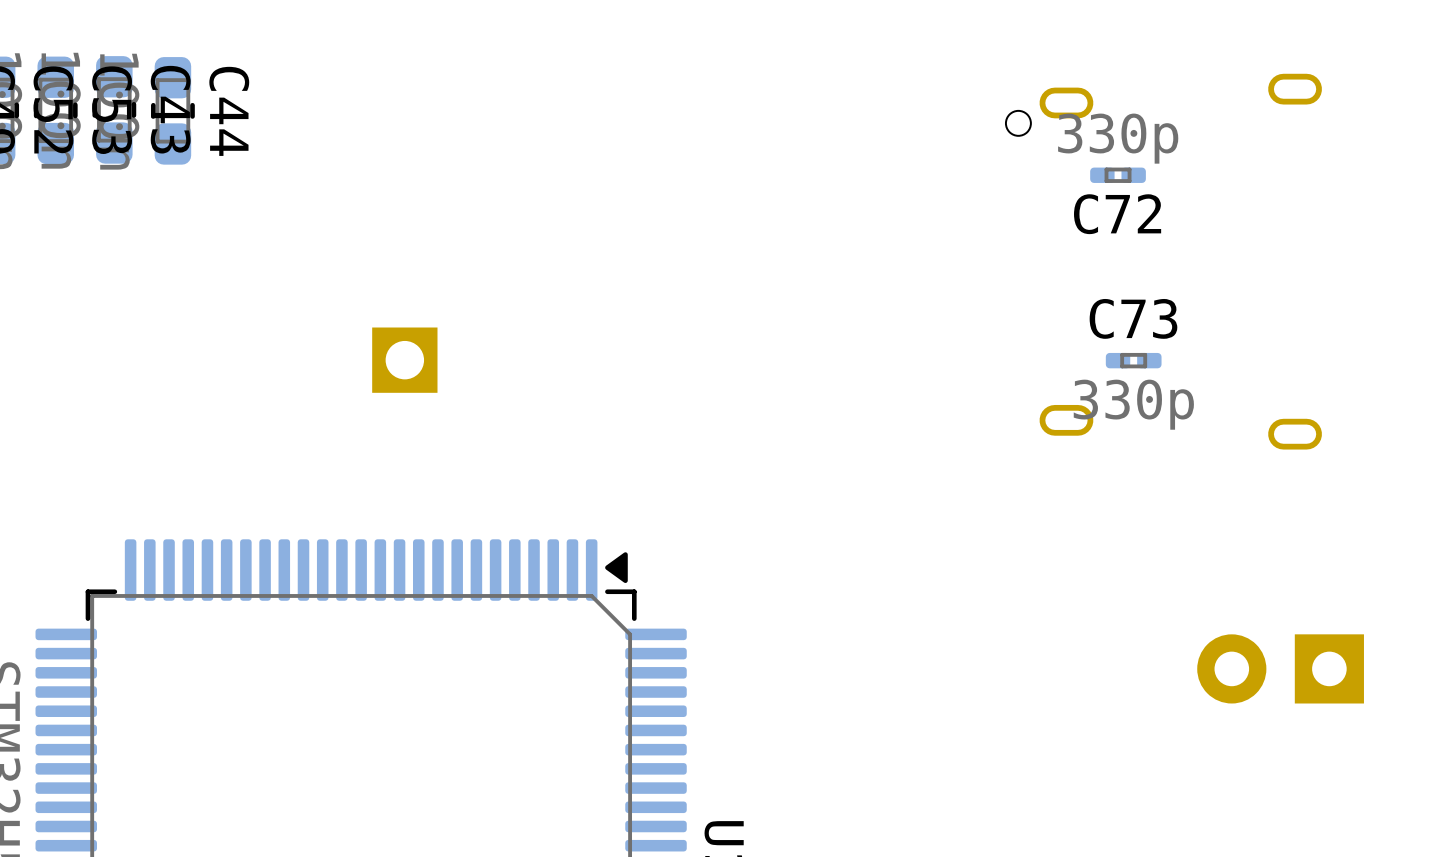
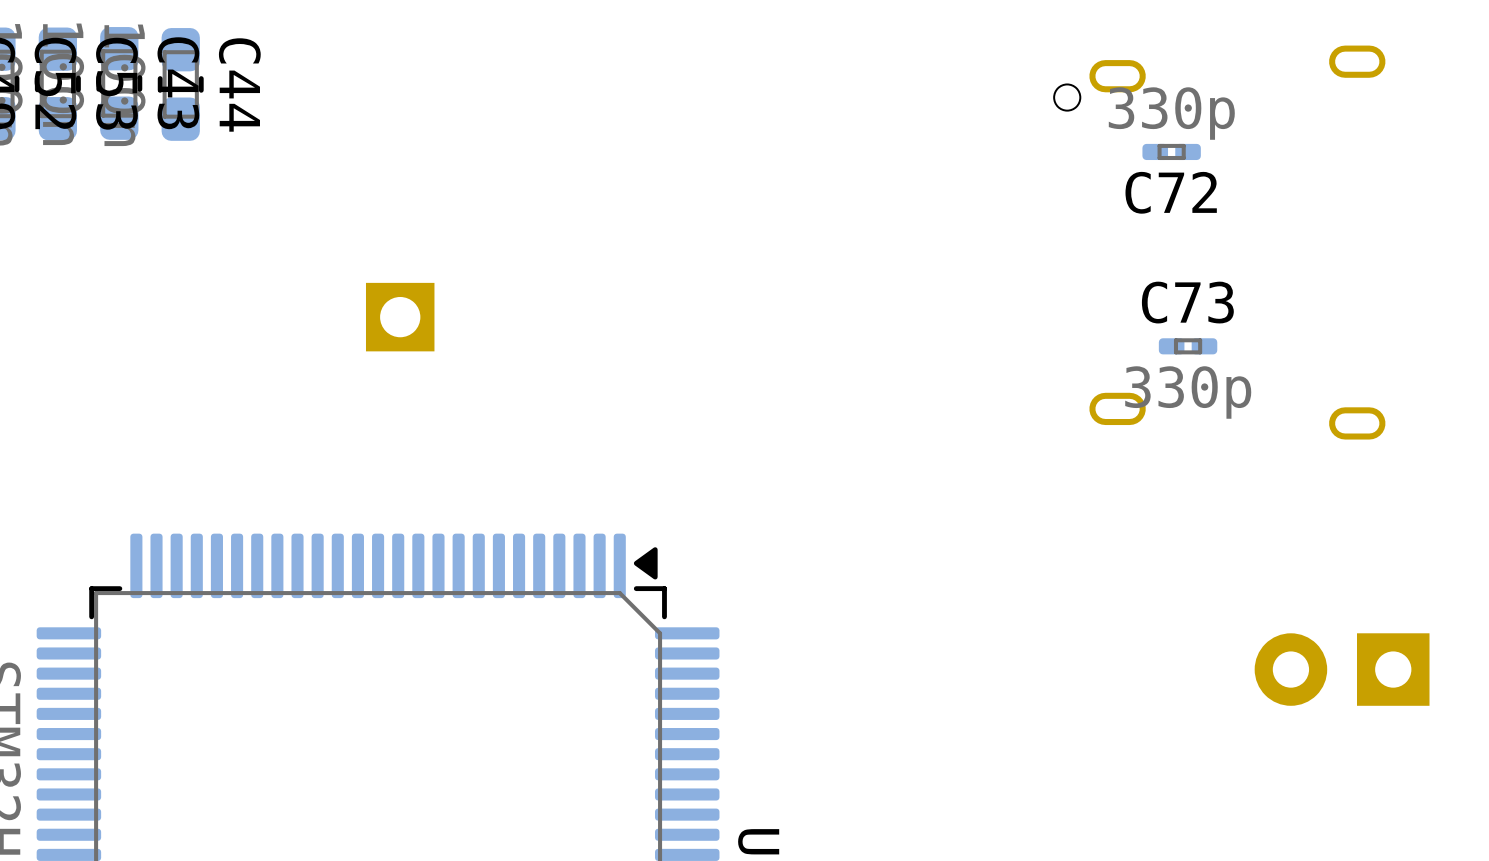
part position: (404, 360) -> (400, 317)

